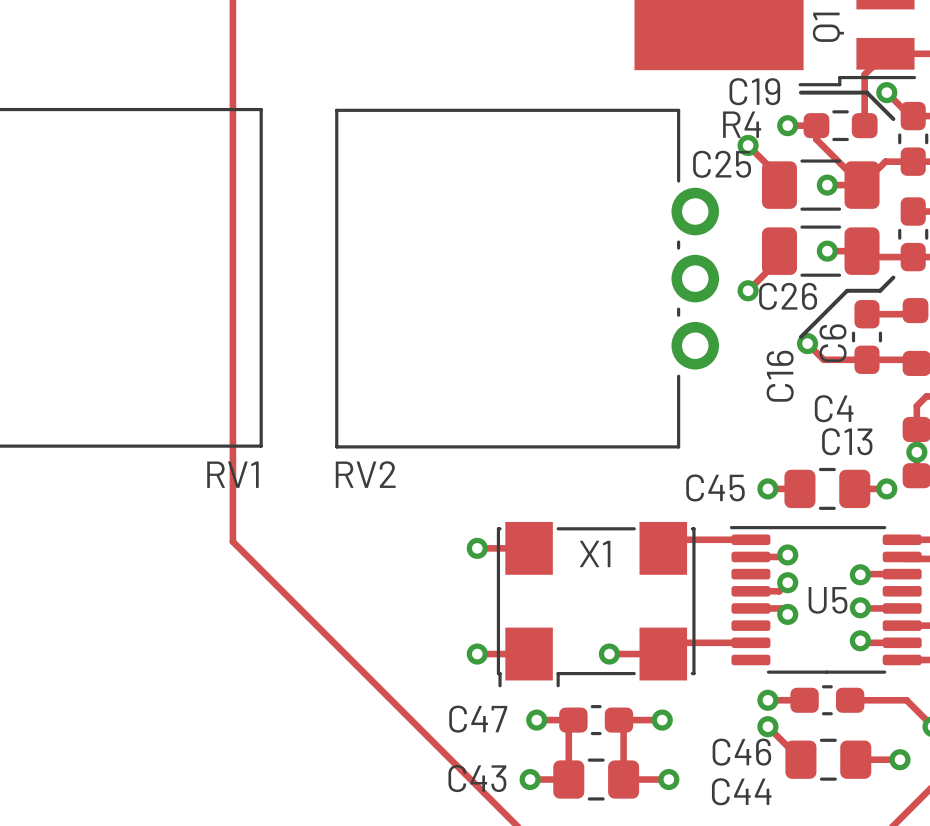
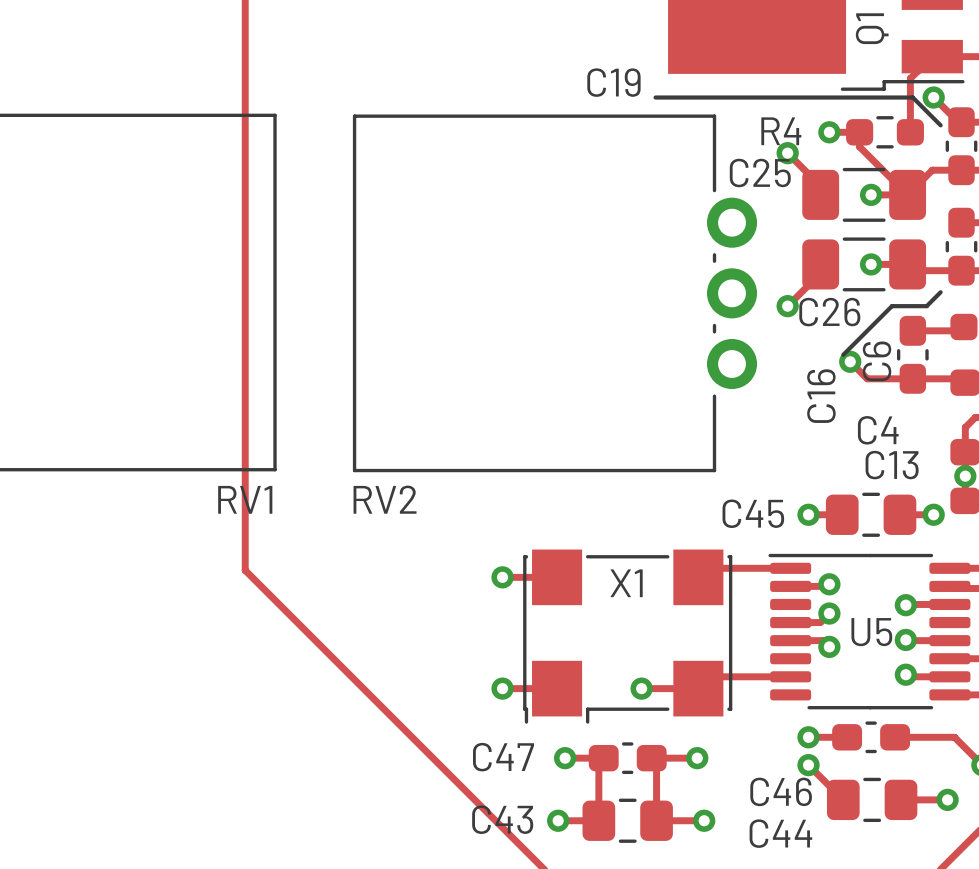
C19 name position: C19 (754, 91) -> C19 (613, 82)
line: none -> (655, 97) (843, 97)

